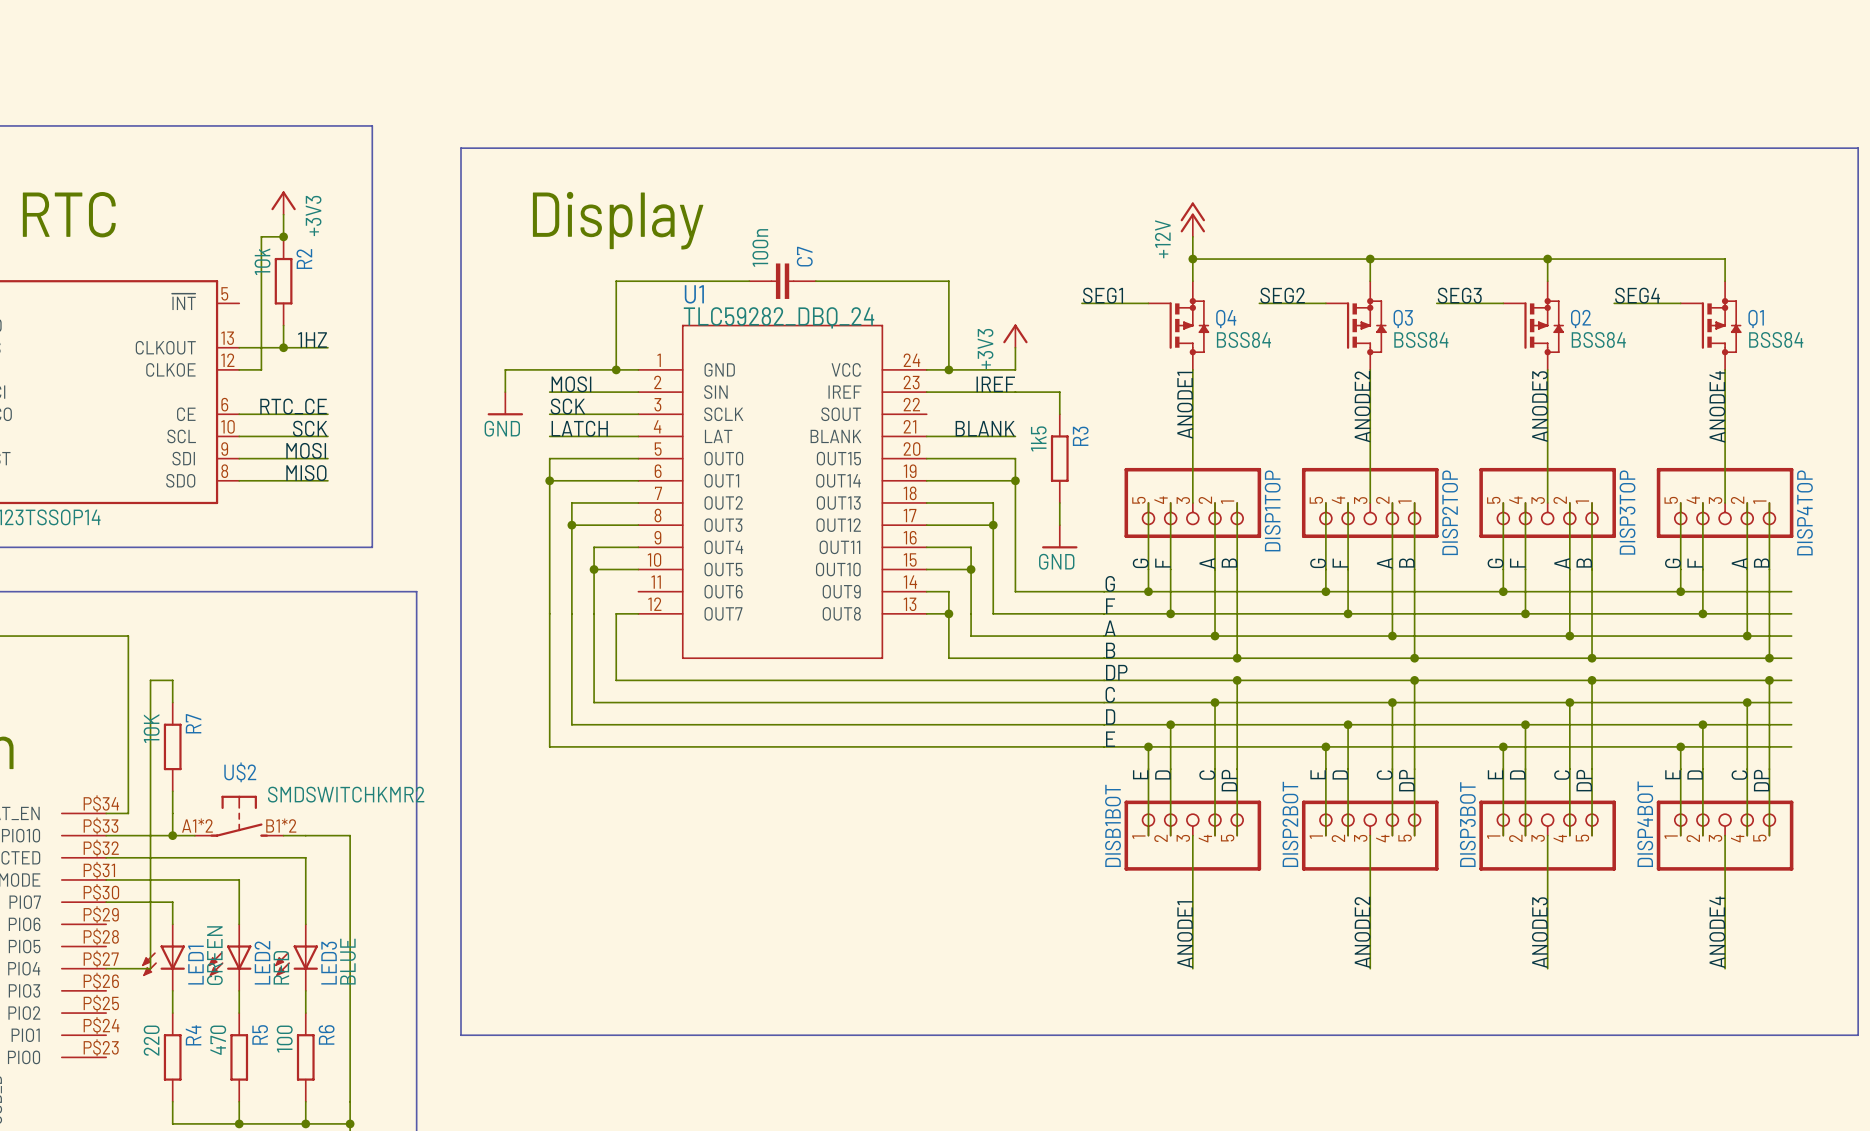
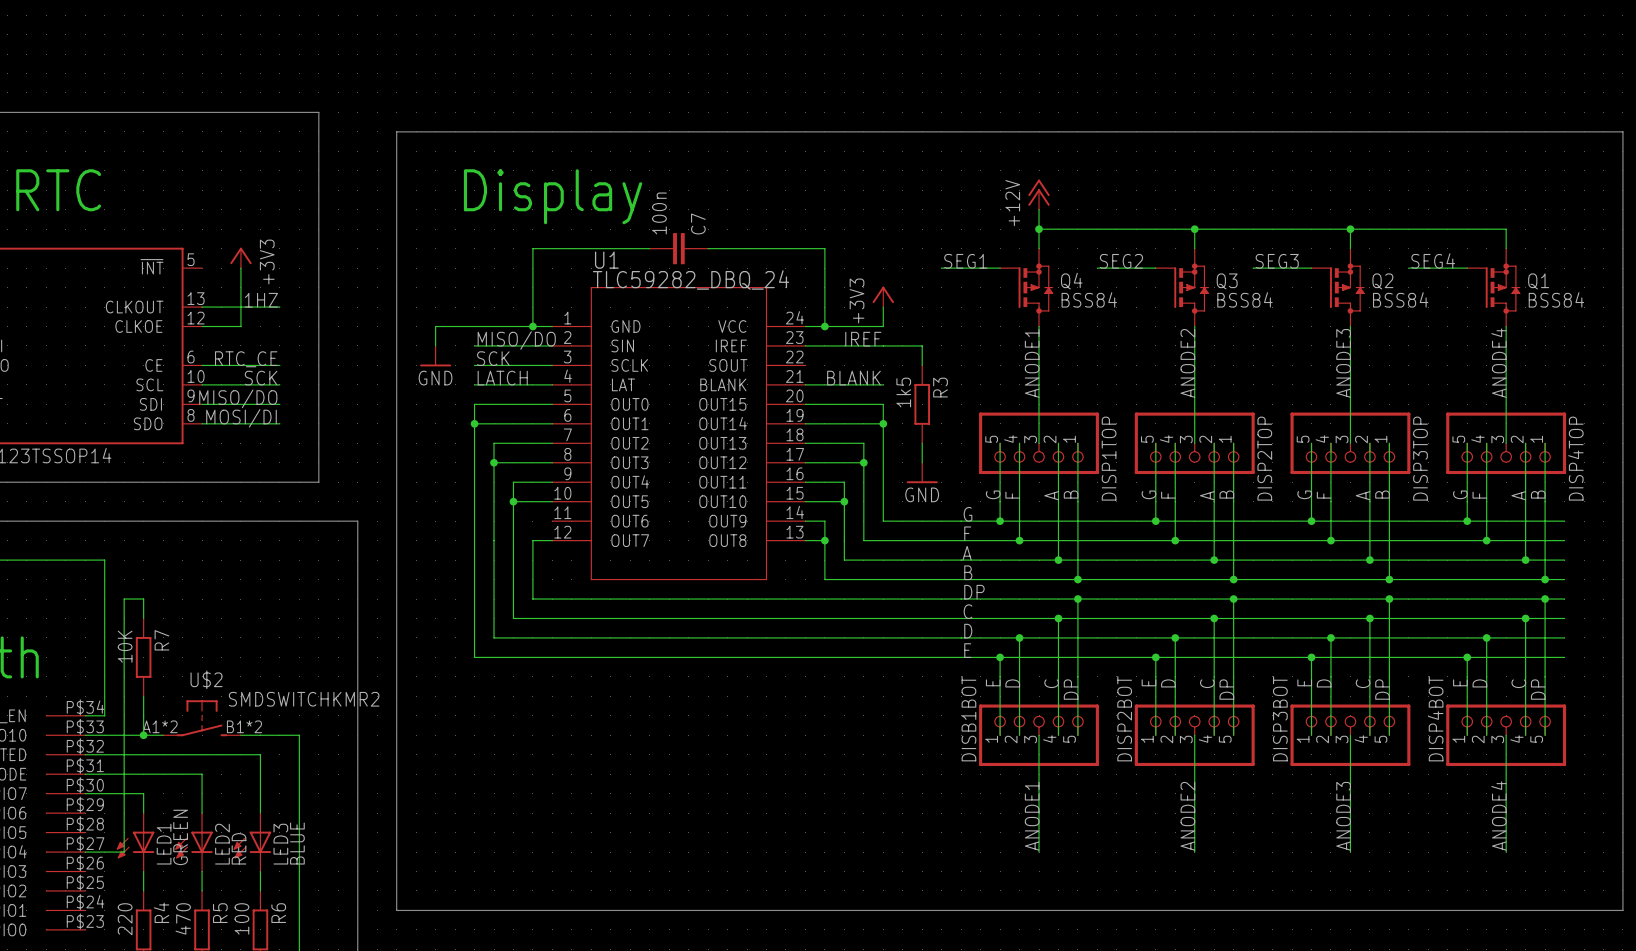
power symbol position: +3V3 (283, 203) -> +3V3 (240, 257)
wire: (283, 214) (283, 236) (261, 236) (261, 369) -> (240, 307) (240, 326) (221, 326)
junction: (283, 236) -> none
R2: 10k (283, 281) -> none
junction: (283, 347) -> none
label: MOSI (571, 384) -> MISO/DO (516, 340)
label: MOSI (306, 450) -> MISO/DO (238, 398)
label: MISO (306, 473) -> MOSI/DI (241, 418)

